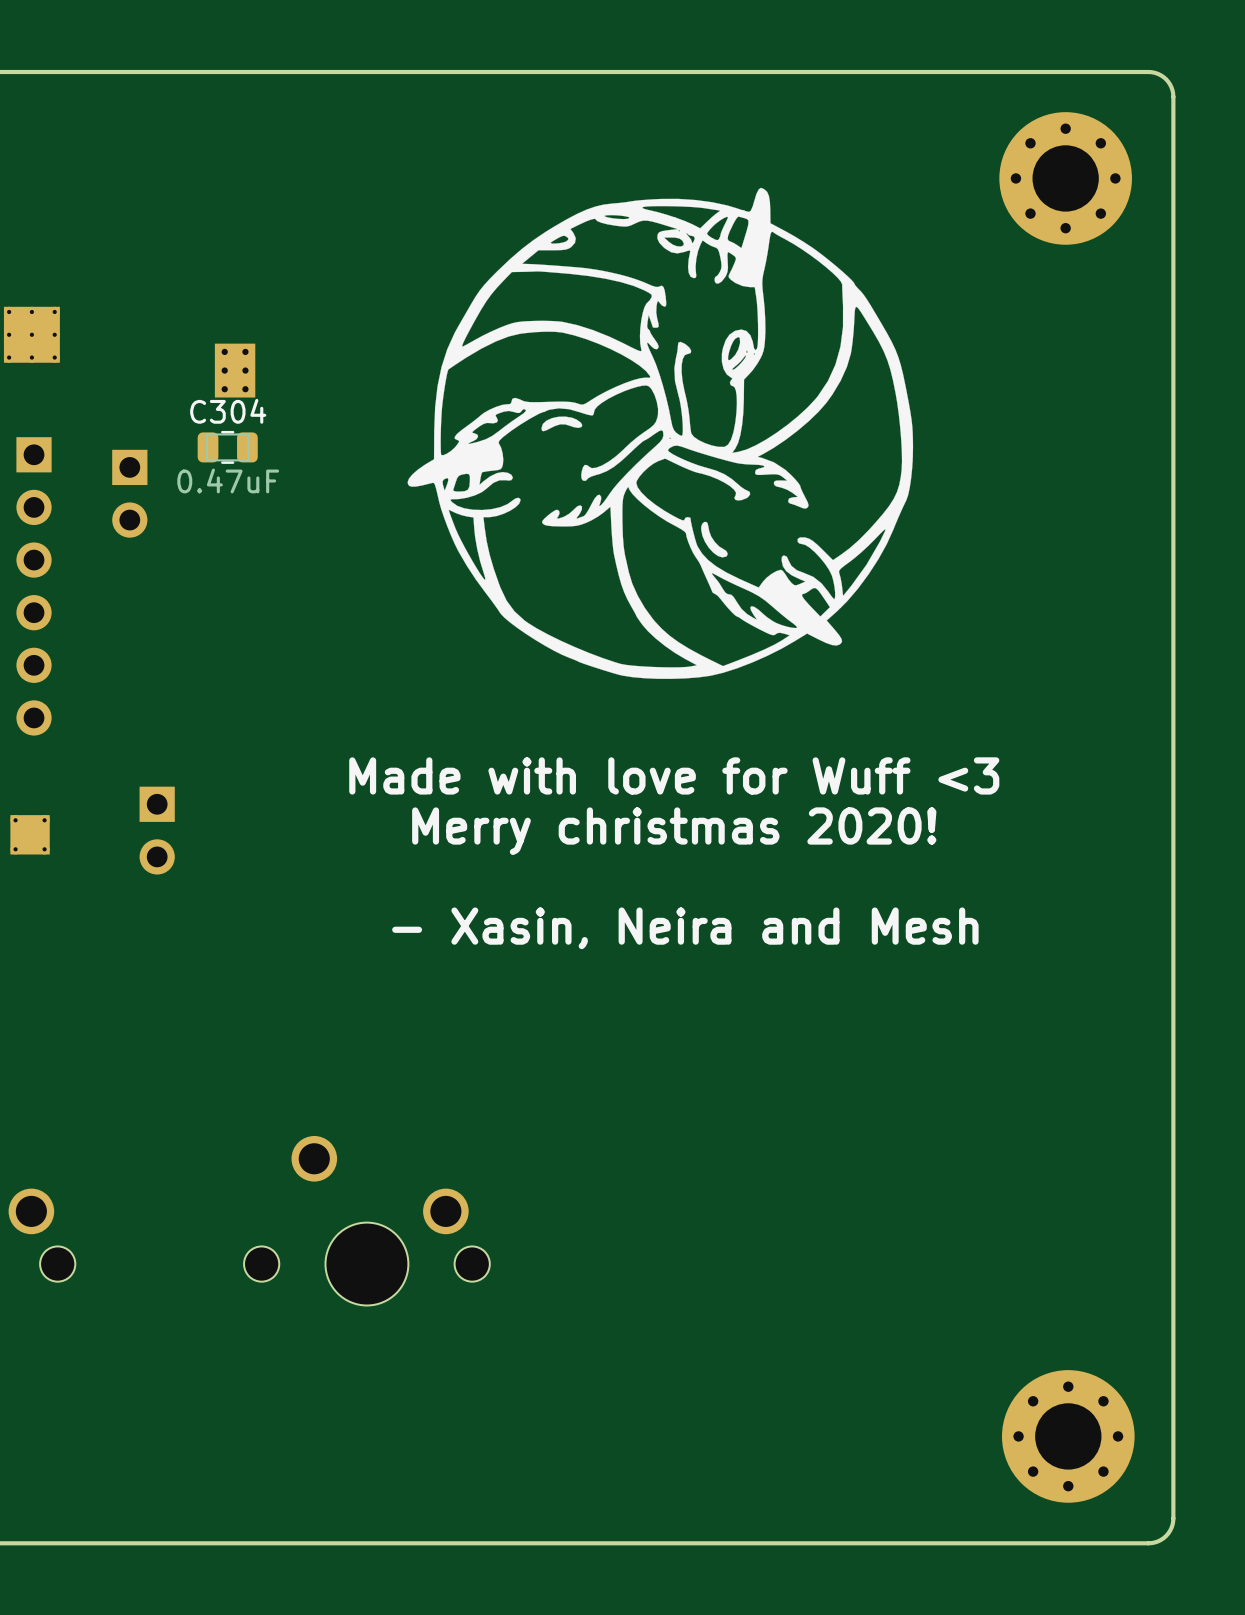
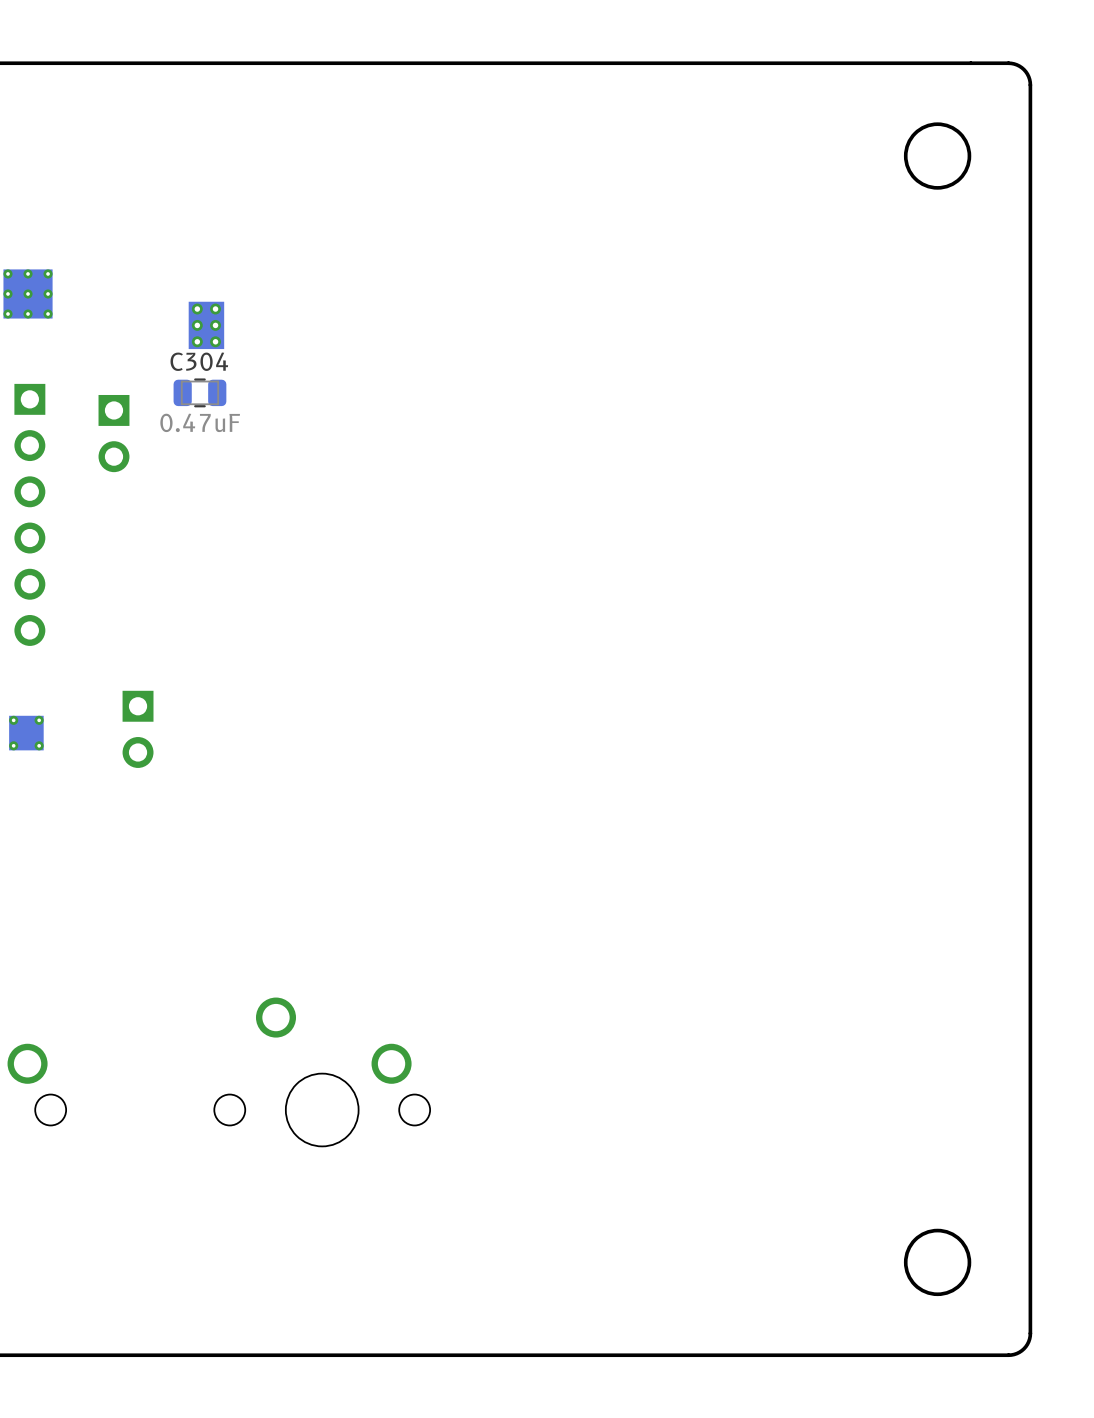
round board edge: none -> [903, 122, 972, 190]
part: (1065, 178) -> none
drawing: [407, 187, 914, 679] -> none
text: Made with love for Wuff <3 (674, 775) -> none
text: Merry christmas 2020! (674, 831) -> none
text: - Xasin, Neira and Mesh (685, 928) -> none
round board edge: none -> [903, 1228, 972, 1297]
part: (1068, 1436) -> none

